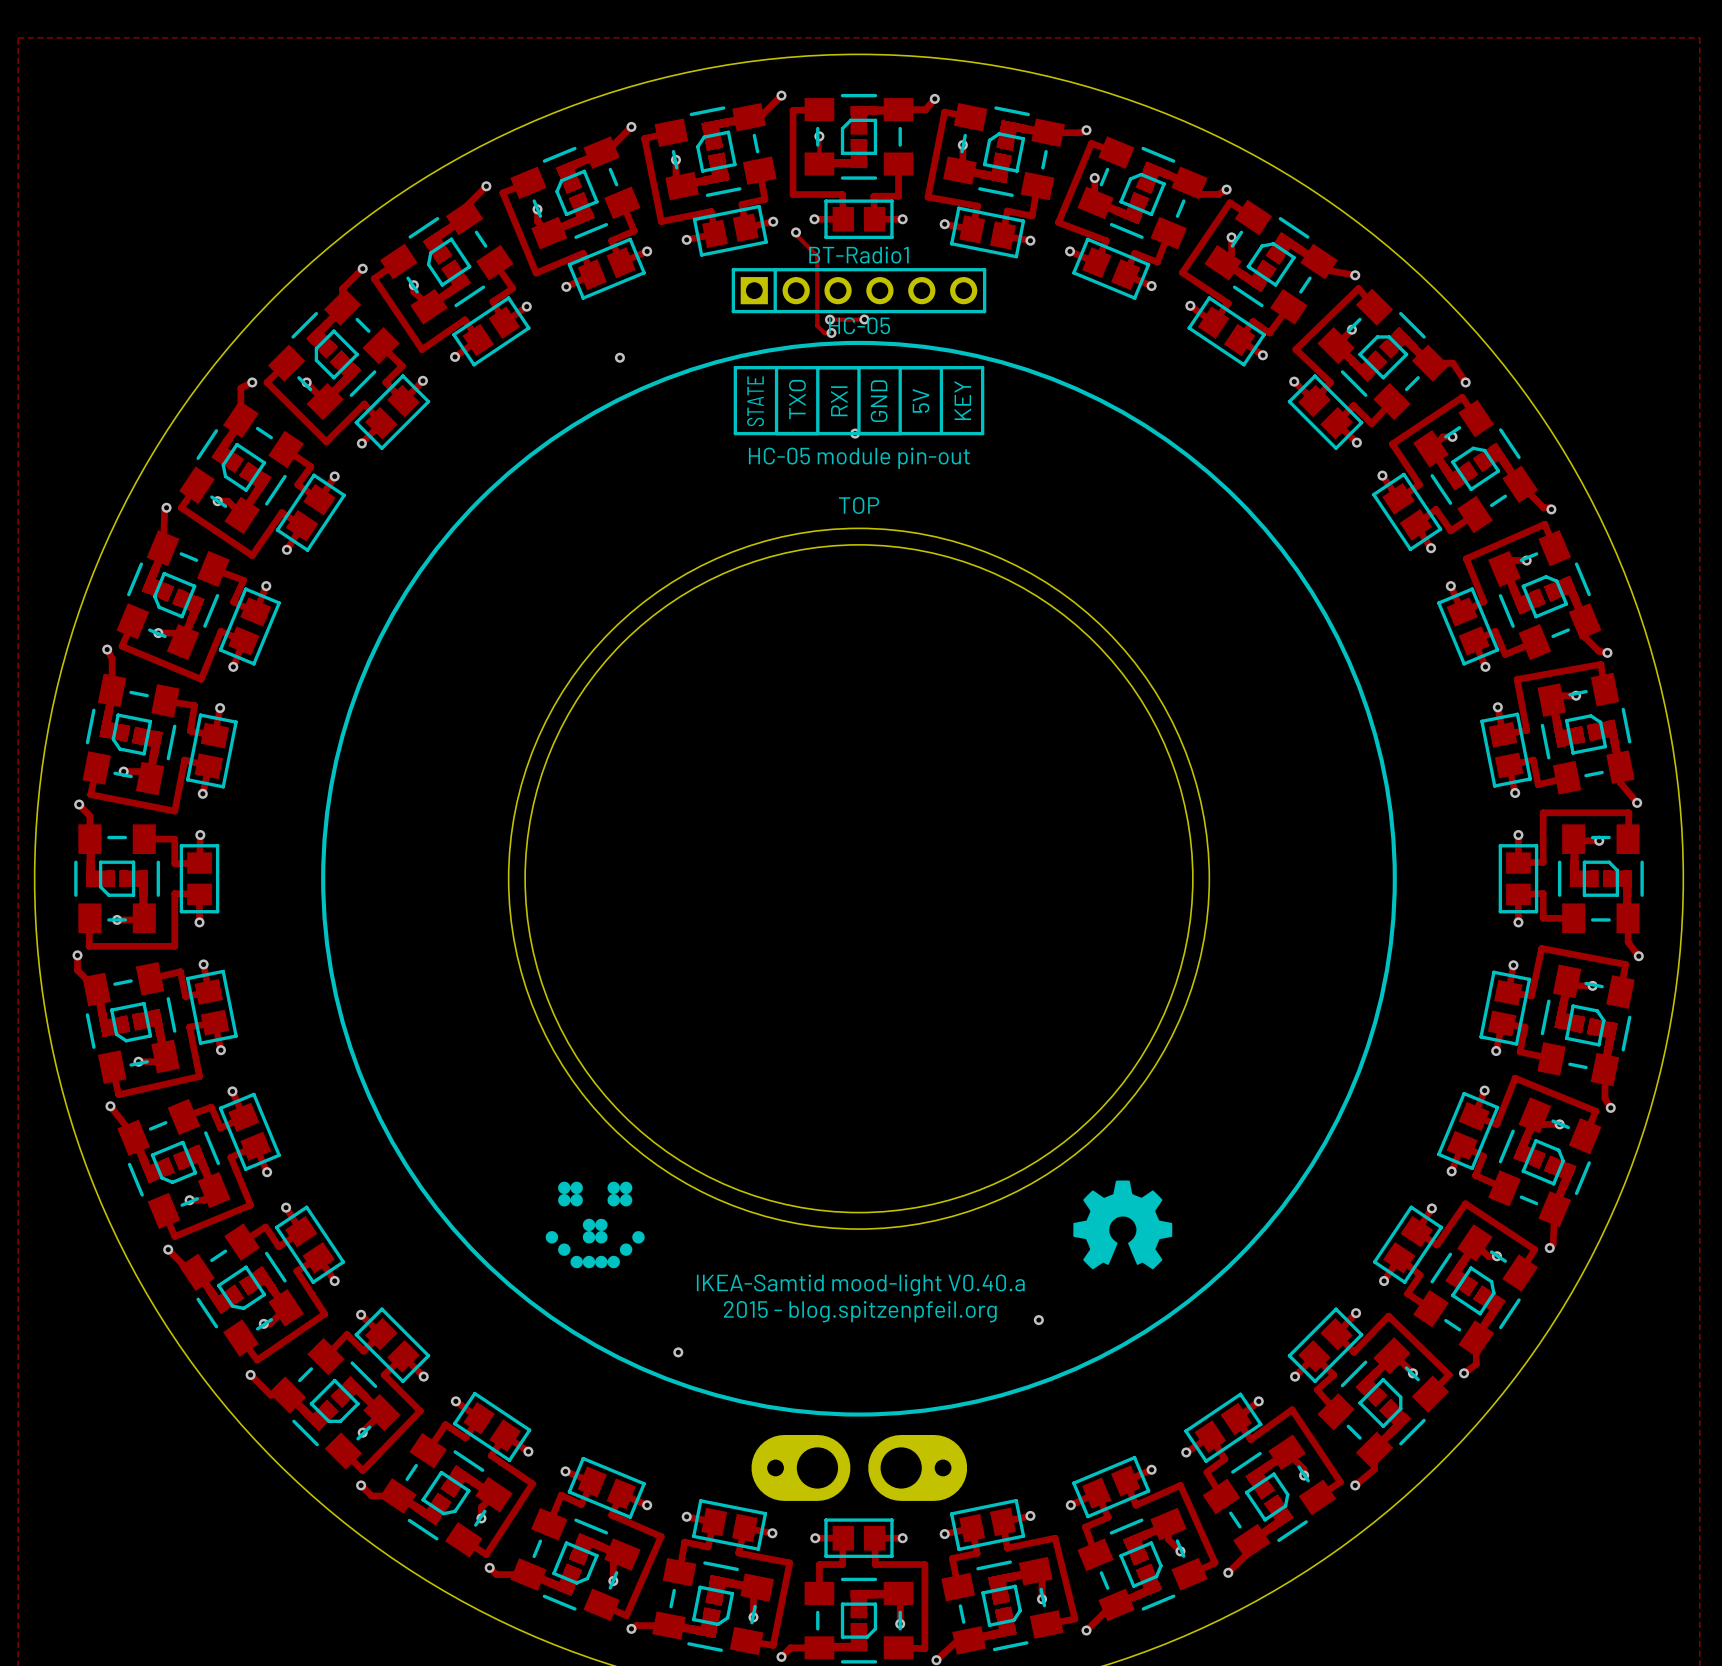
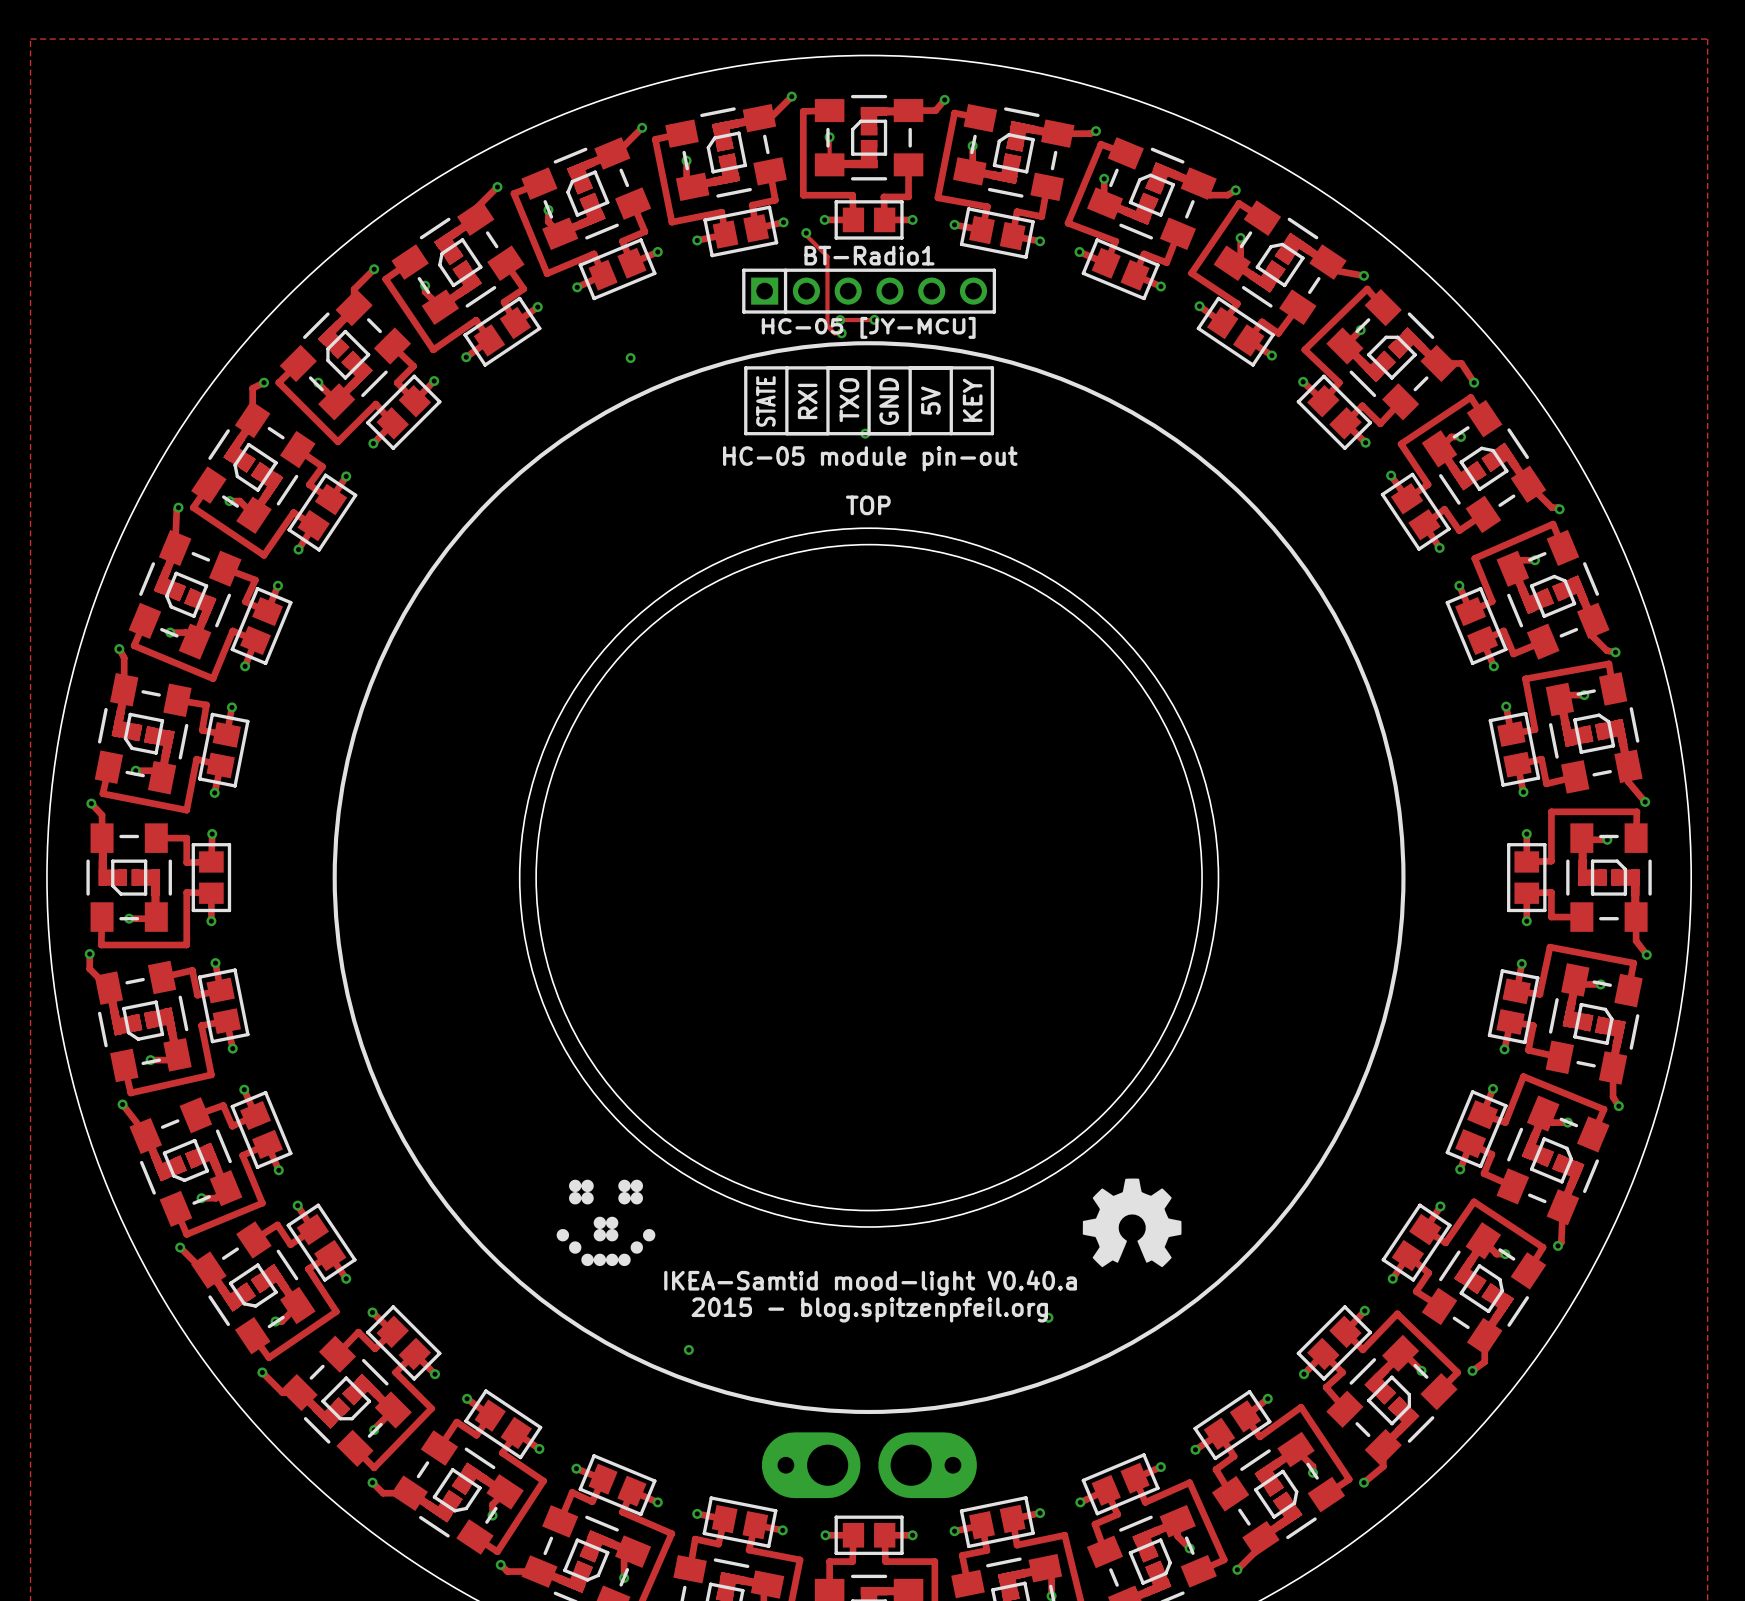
BT-Radio1 value: HC-05 (859, 325) -> HC-05 [JY-MCU] (868, 327)
text: TXO (797, 399) -> RXI (807, 401)
text: RXI (839, 401) -> TXO (849, 400)

